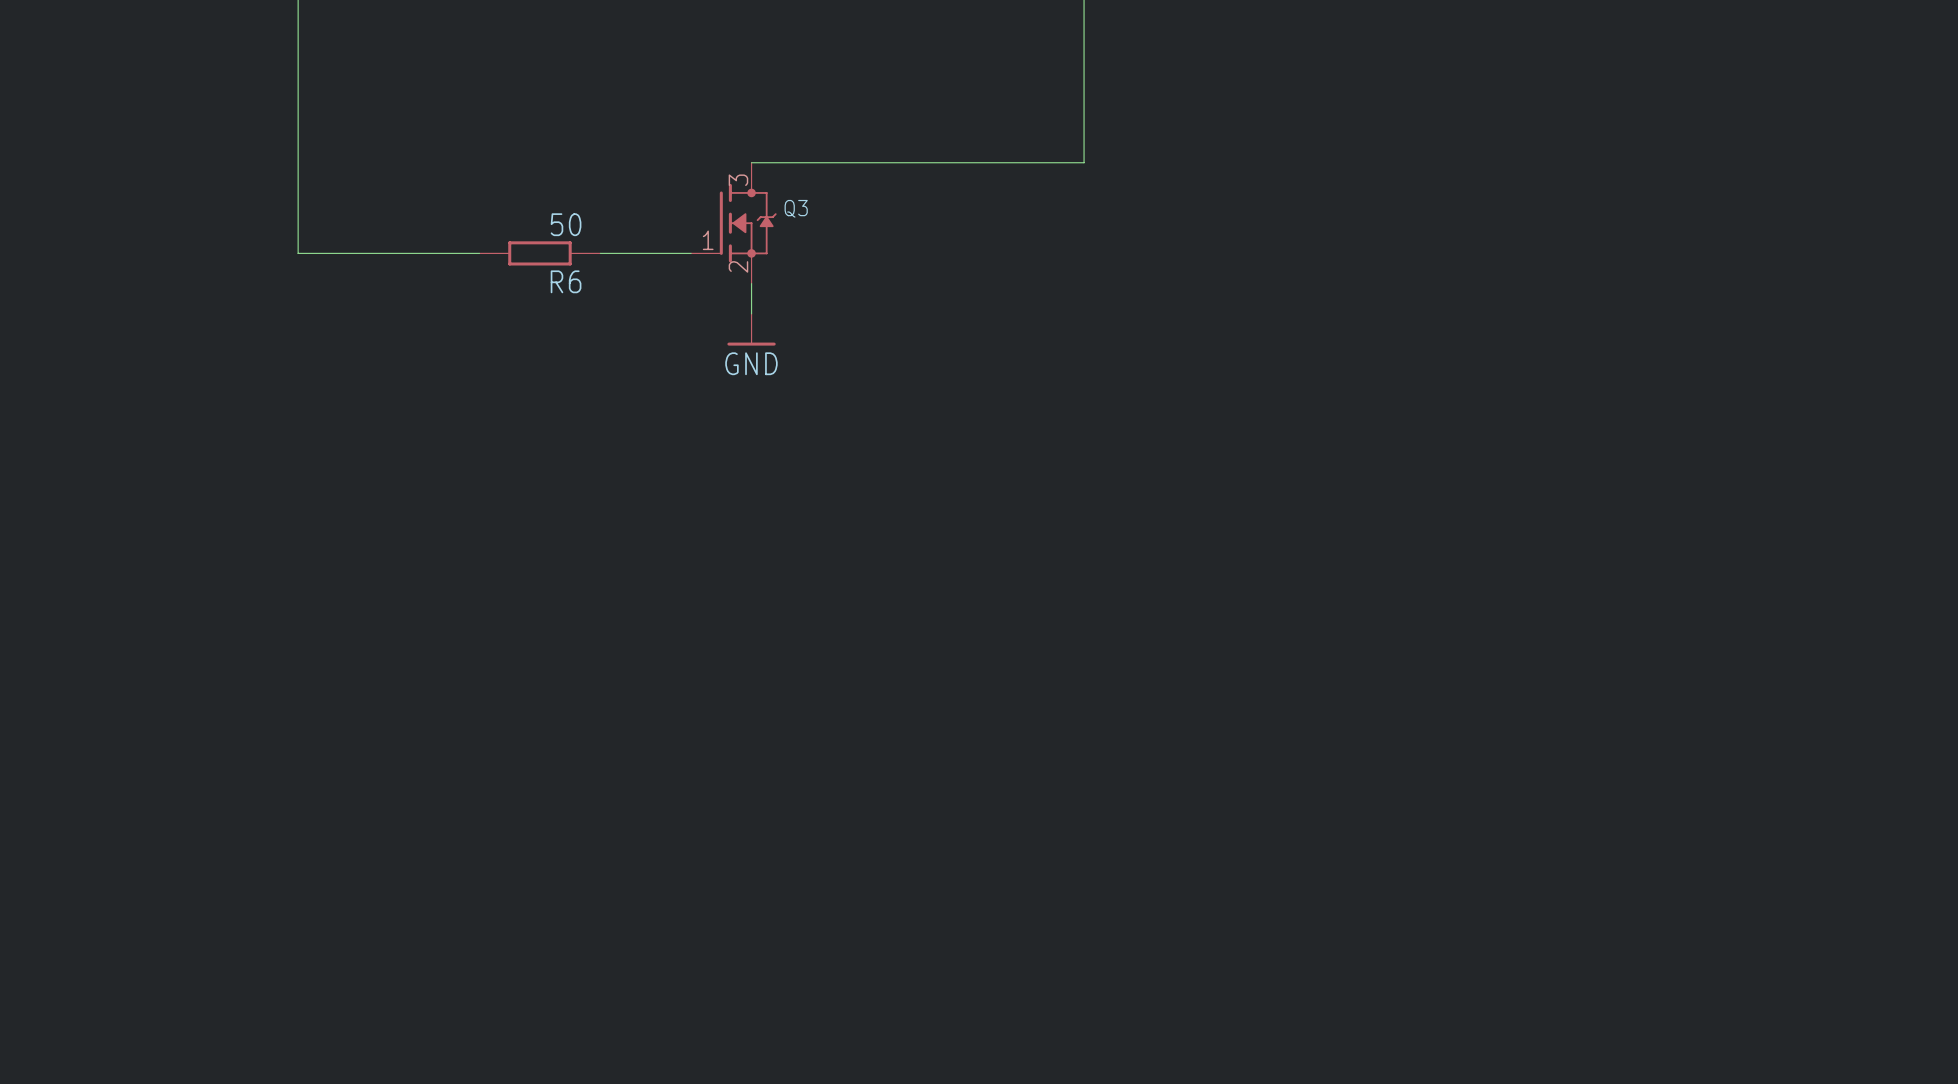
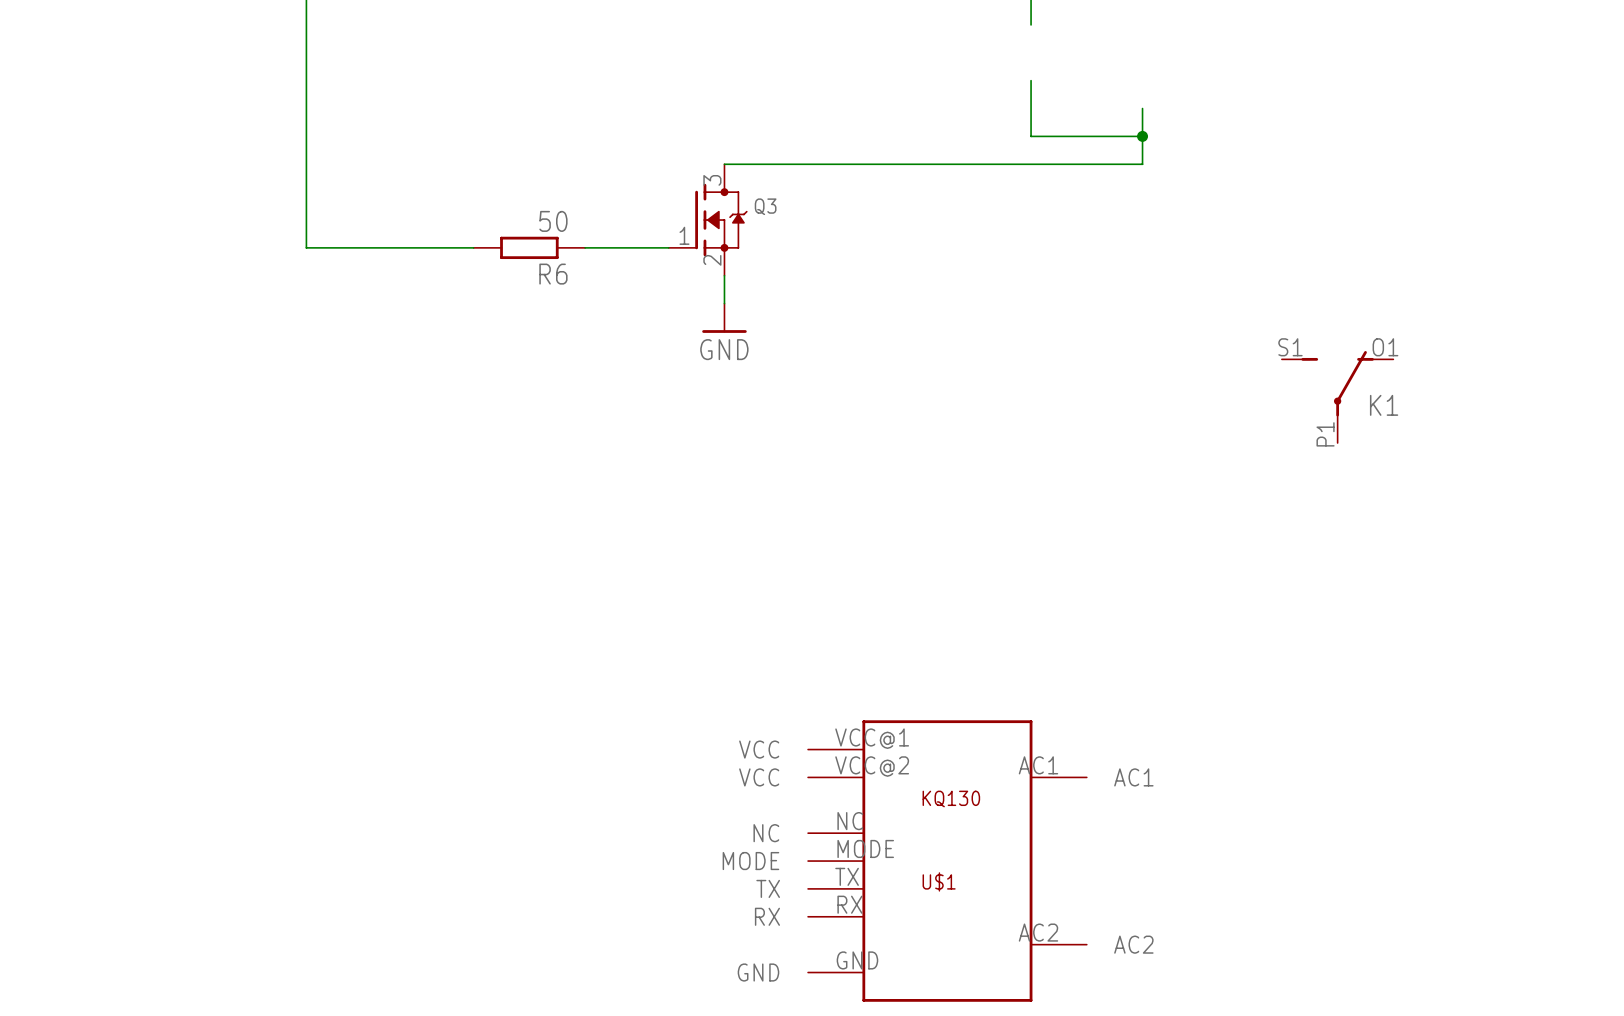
wire: (1084, 11) (1084, 72) -> none
wire: (1084, 132) (1084, 162) -> (1142, 108) (1142, 164) (1031, 164)
wire: none -> (1031, 136) (1142, 136)
junction: none -> (1142, 136)
K1: none -> (1337, 396)
U$1: none -> KQ130 (947, 861)

